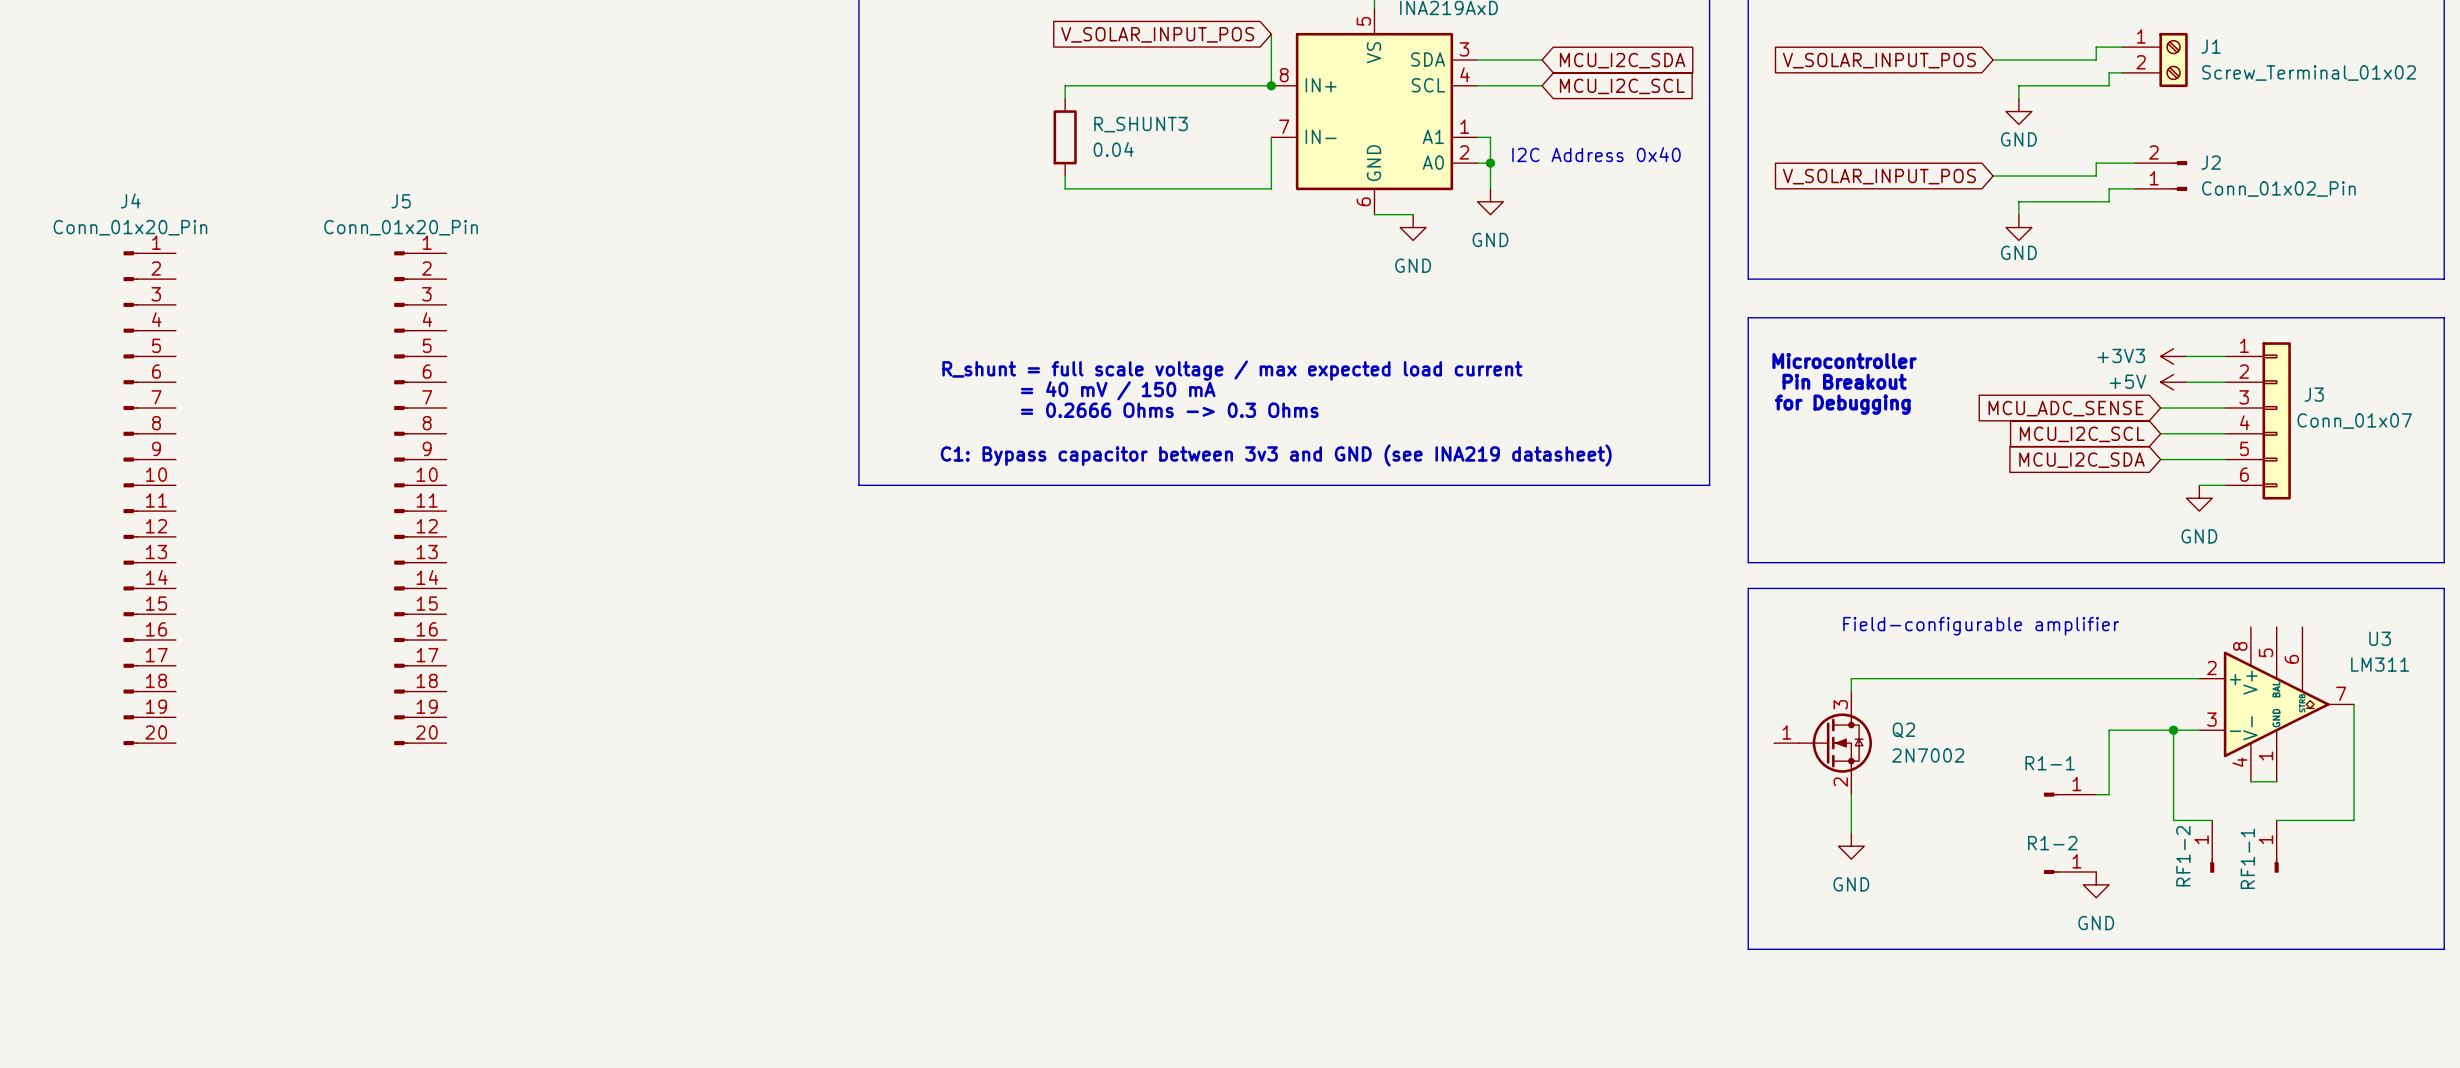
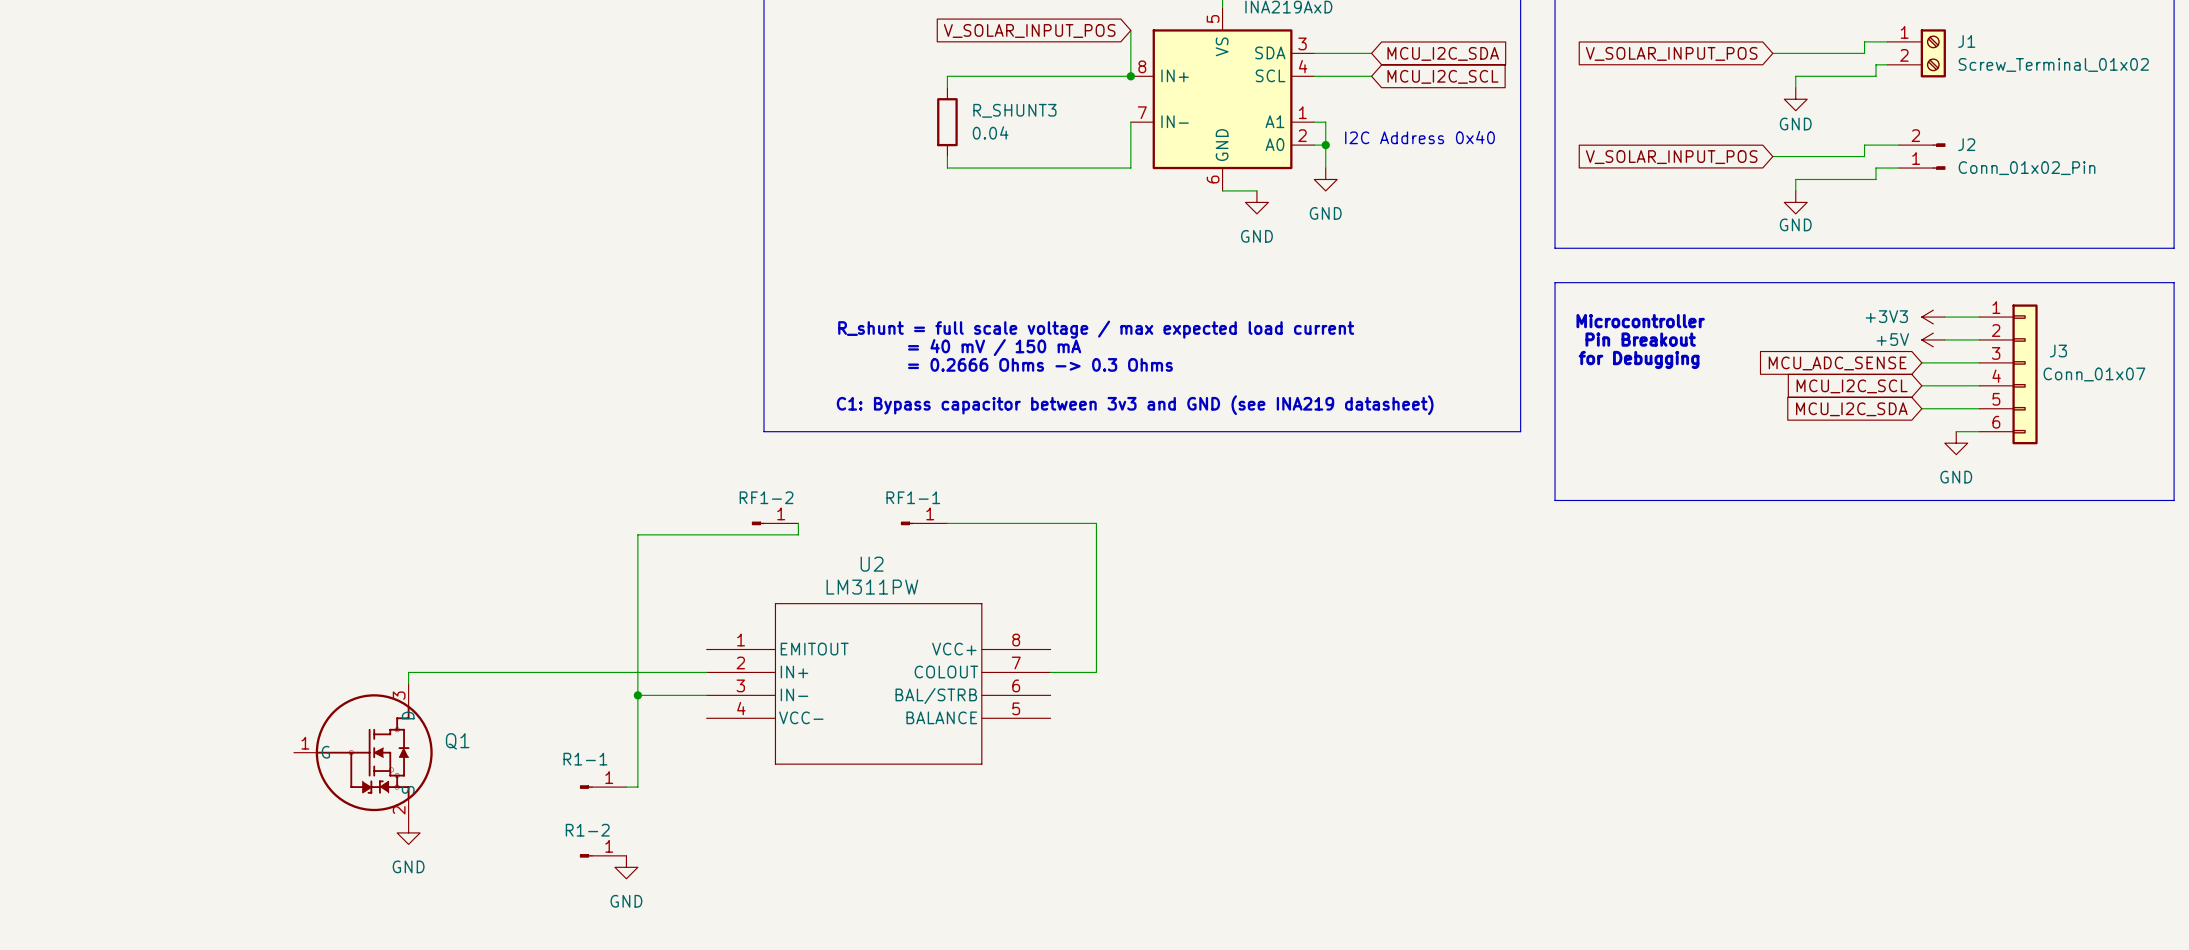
J4: Conn_01x20_Pin (149, 498) -> none
J5: Conn_01x20_Pin (420, 498) -> none
wire: none -> (798, 523) (798, 534) (637, 534) (637, 787) (626, 787)
wire: none -> (947, 523) (1096, 523) (1096, 672) (1050, 672)
line: (1748, 588) (2444, 588) (2444, 949) (1748, 949) (1748, 588) -> none
text: Field-configurable amplifier (1981, 626) -> none
wire: (2199, 678) (1851, 678) (1851, 691) -> none
U3: LM311 (2276, 704) -> none
wire: (2354, 704) (2354, 820) (2276, 820) -> none
wire: (2173, 730) (2173, 820) (2212, 820) -> none
junction: (2173, 730) -> none
wire: (2199, 730) (2109, 730) (2109, 794) (2096, 794) -> none
Q2: 2N7002 (1822, 743) -> none
wire: none -> (706, 672) (408, 672) (408, 683)
U2: none -> LM311PW (878, 683)
wire: none -> (637, 695) (706, 695)
junction: none -> (637, 695)
wire: (2250, 781) (2276, 781) -> none
wire: (1851, 794) (1851, 833) -> none
R1-1 position: (2070, 794) -> (603, 787)
Q1: none -> (363, 752)
power symbol: GND (1851, 846) -> none
RF1-2 position: (2212, 846) -> (775, 523)
RF1-1 position: (2276, 846) -> (924, 523)
RF1-2 rotation: 0° (2212, 865) -> 90° clockwise (758, 523)
RF1-1 rotation: 0° (2276, 865) -> 90° clockwise (907, 523)
R1-2 position: (2070, 871) -> (603, 855)
power symbol: GND (2096, 884) -> none
power symbol: none -> GND (408, 832)
power symbol: none -> GND (626, 867)

